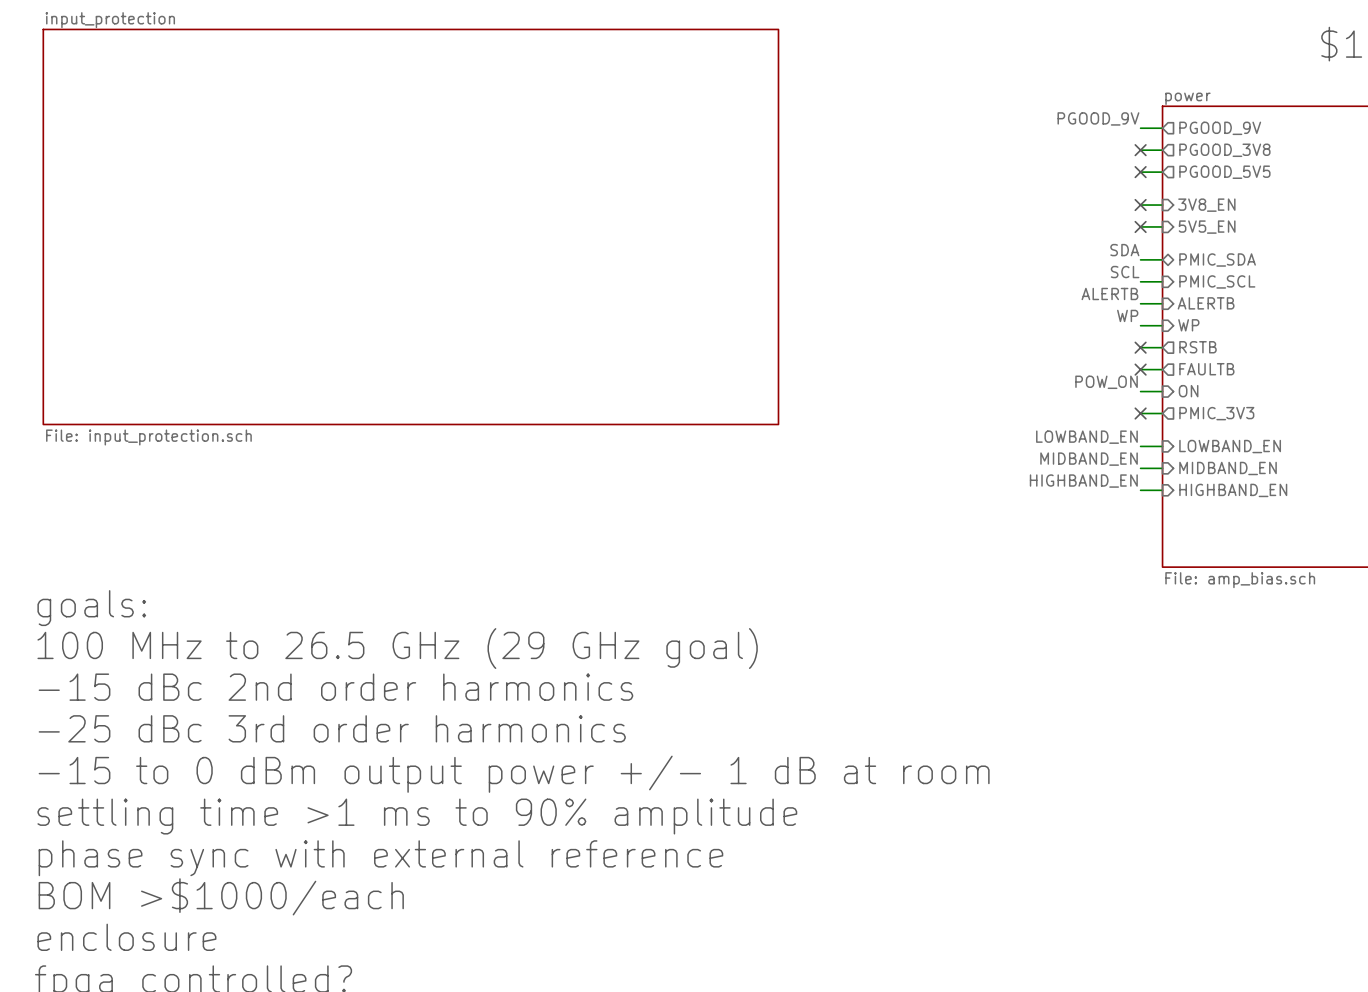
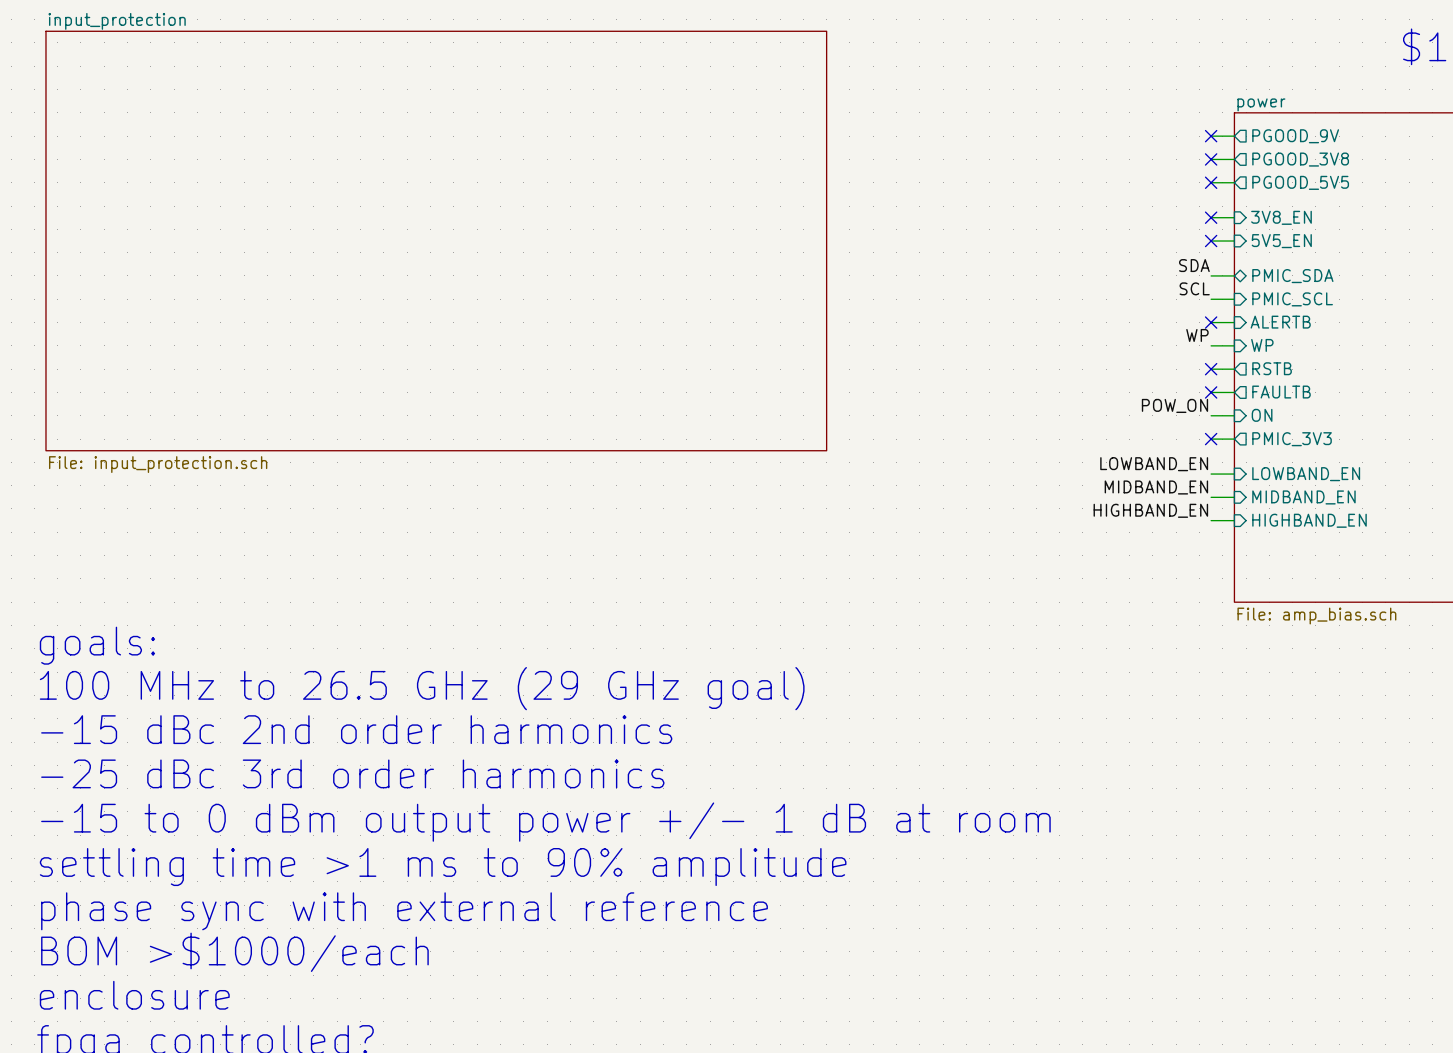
label: PGOOD_9V (1098, 118) -> none
no-connect mark: none -> (1211, 136)
label: ALERTB (1109, 293) -> none
no-connect mark: none -> (1211, 322)

